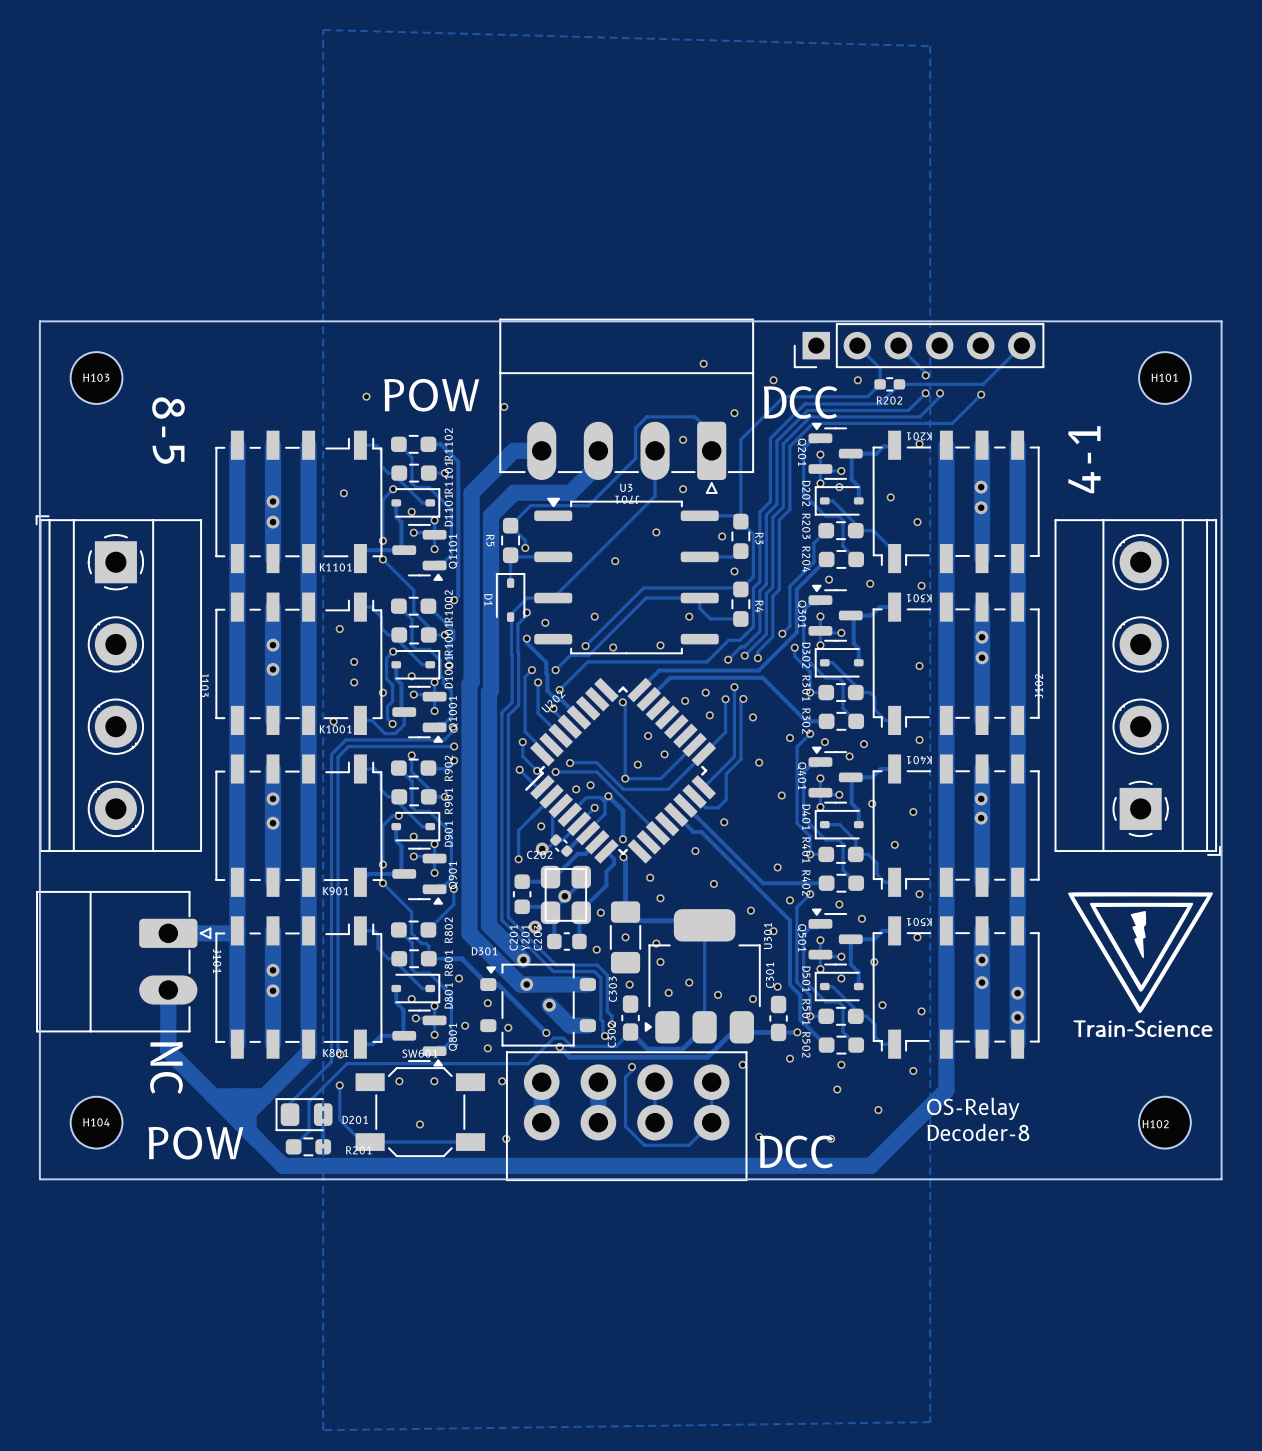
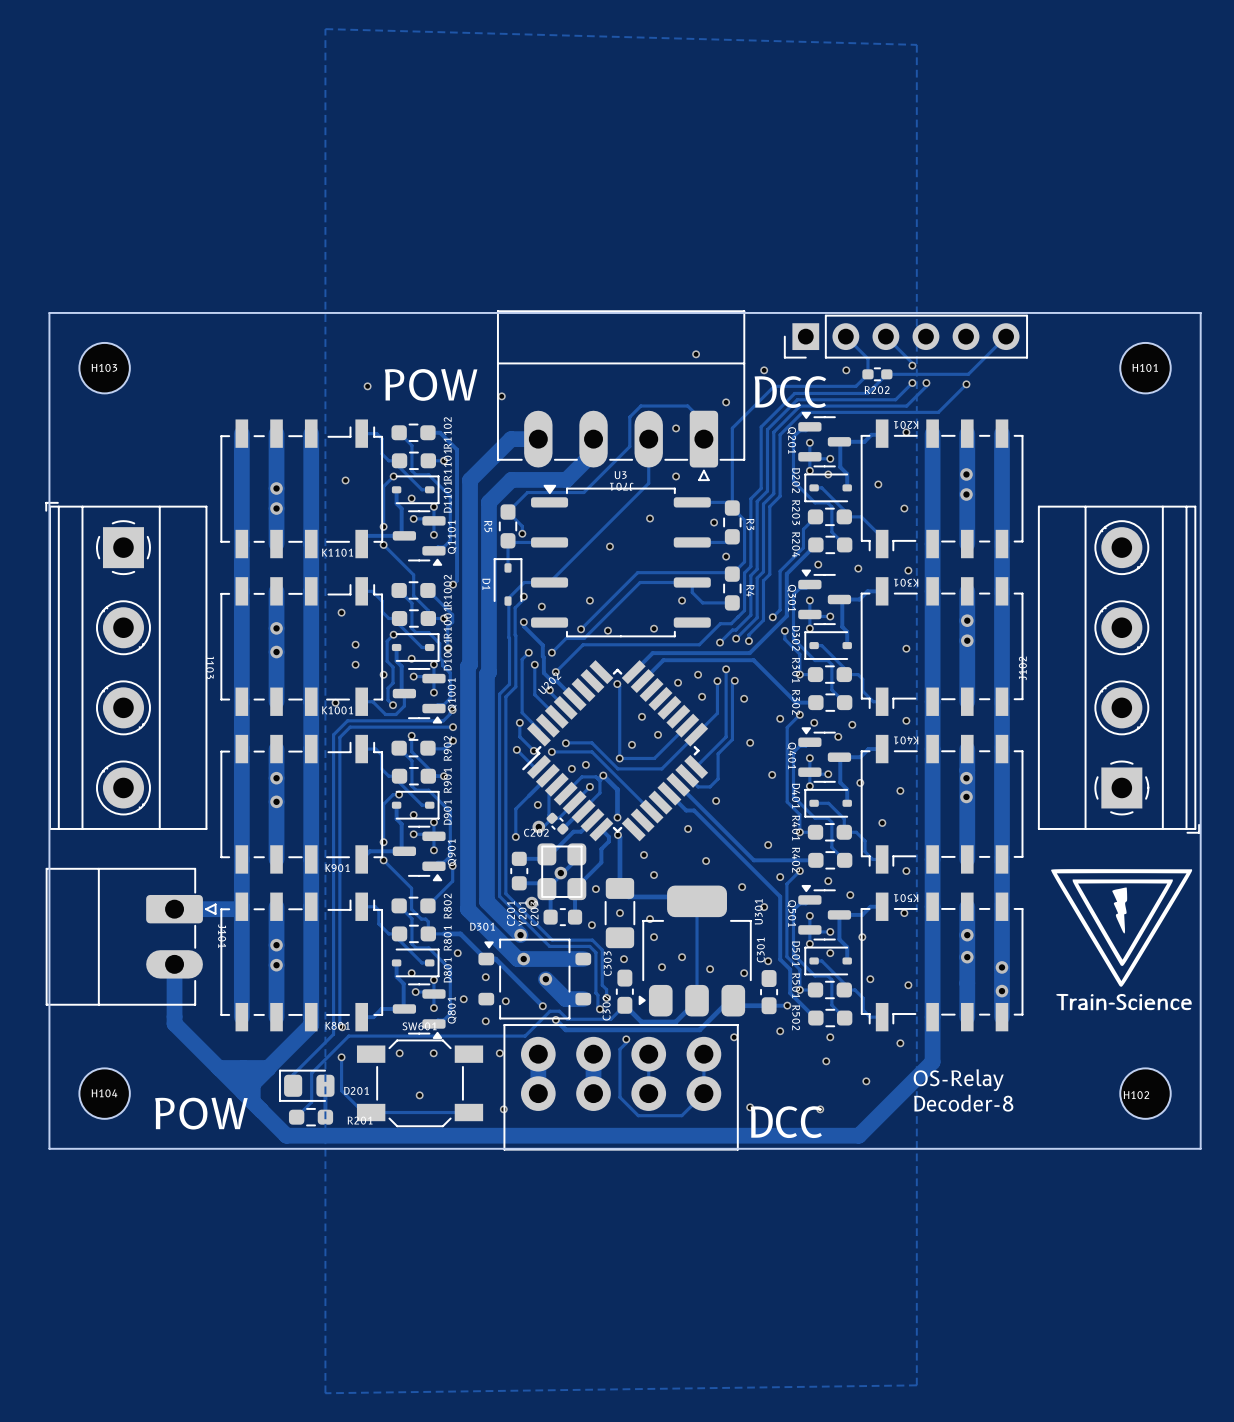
text: 8-5 (168, 430) -> none
text: 4-1 (1084, 459) -> none
text: NC (166, 1067) -> none

